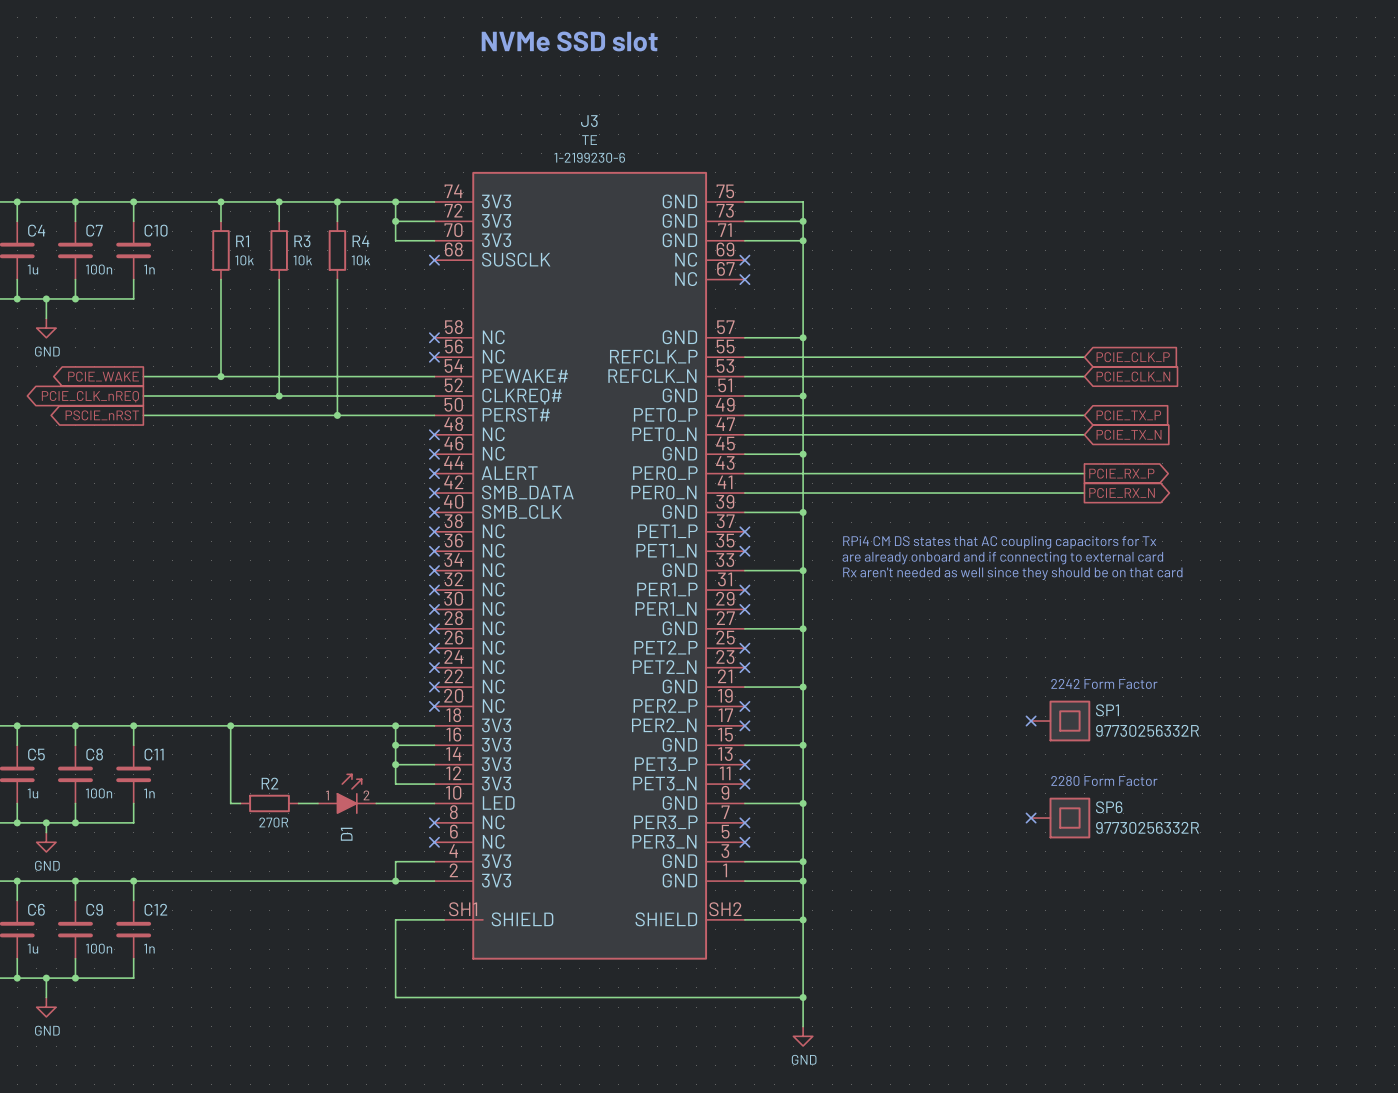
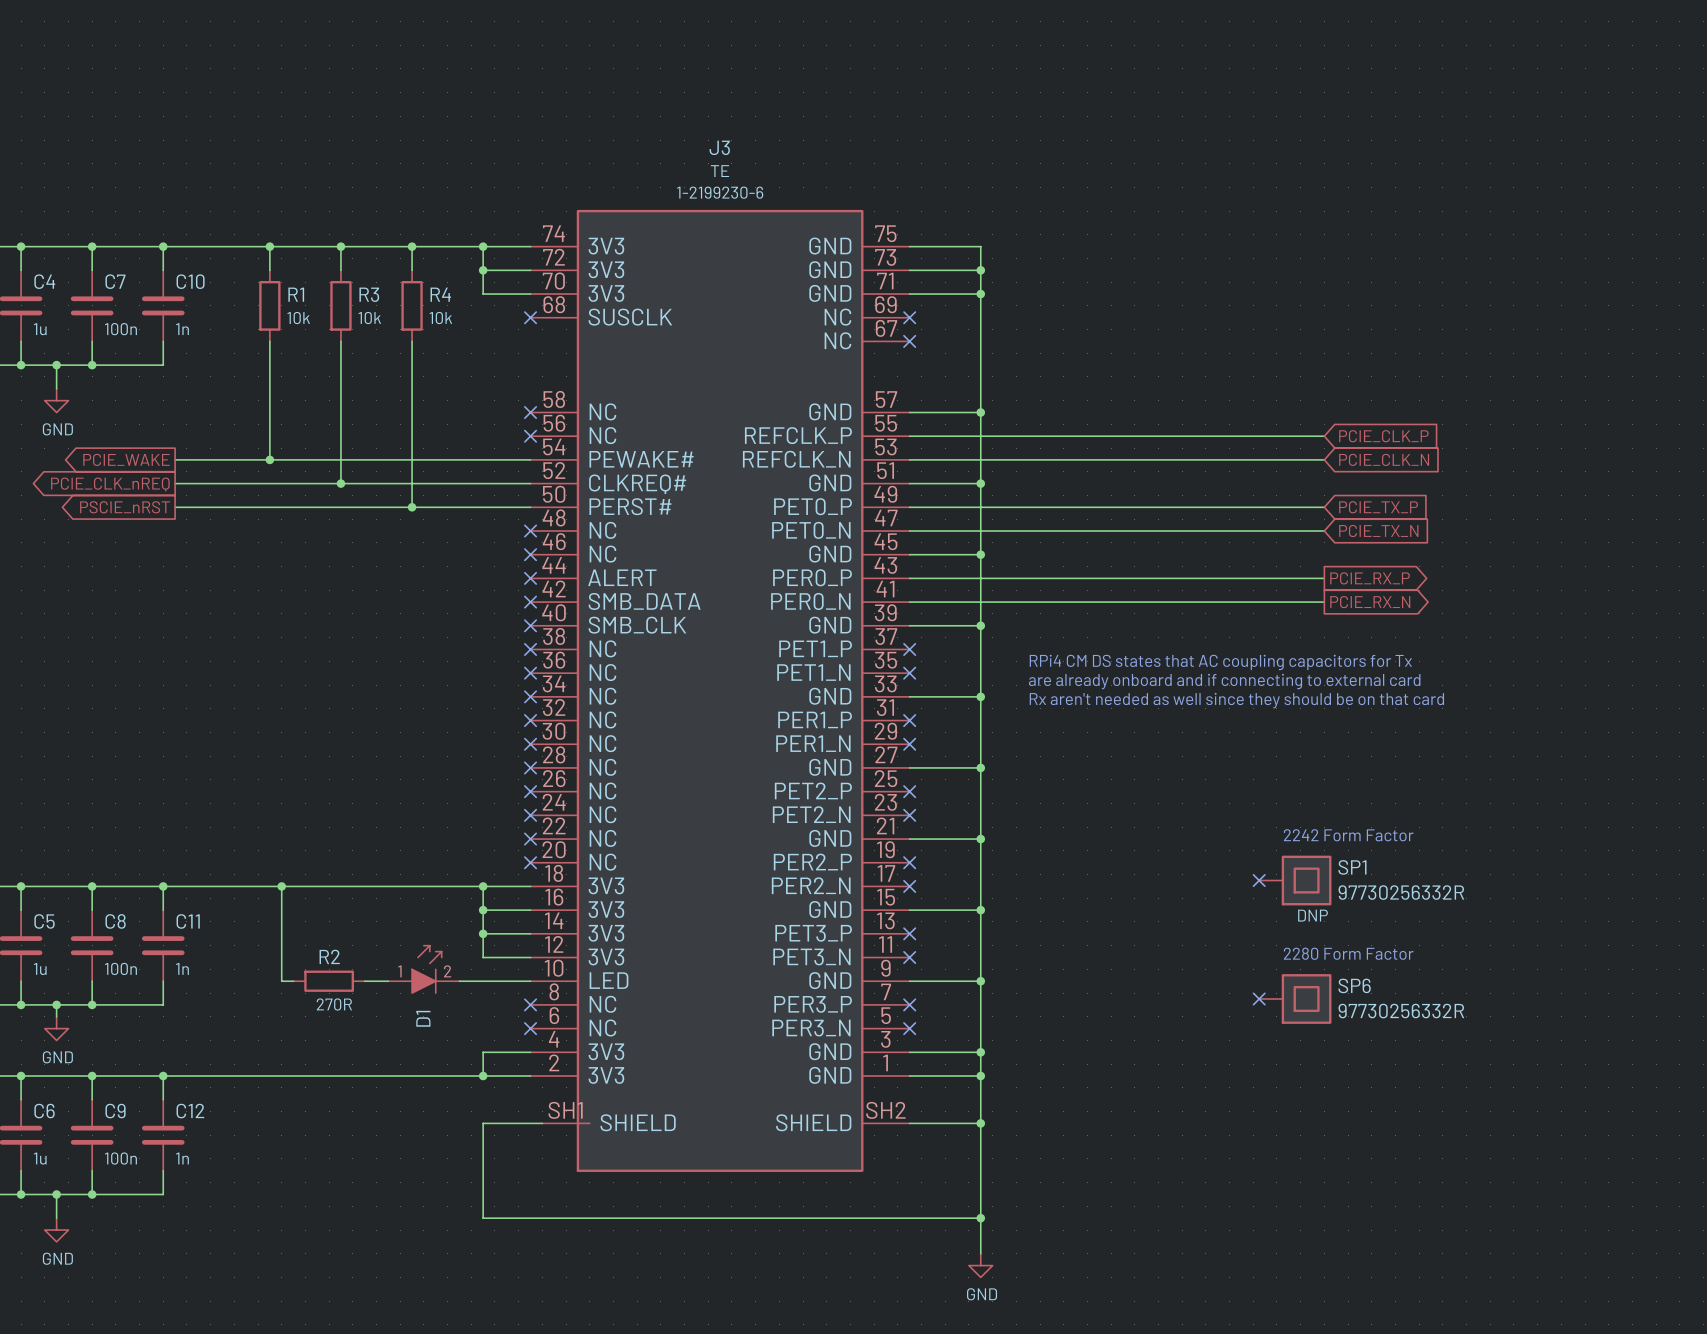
text: NVMe SSD slot (569, 41) -> none
SP1 text: none -> DNP (1313, 915)

